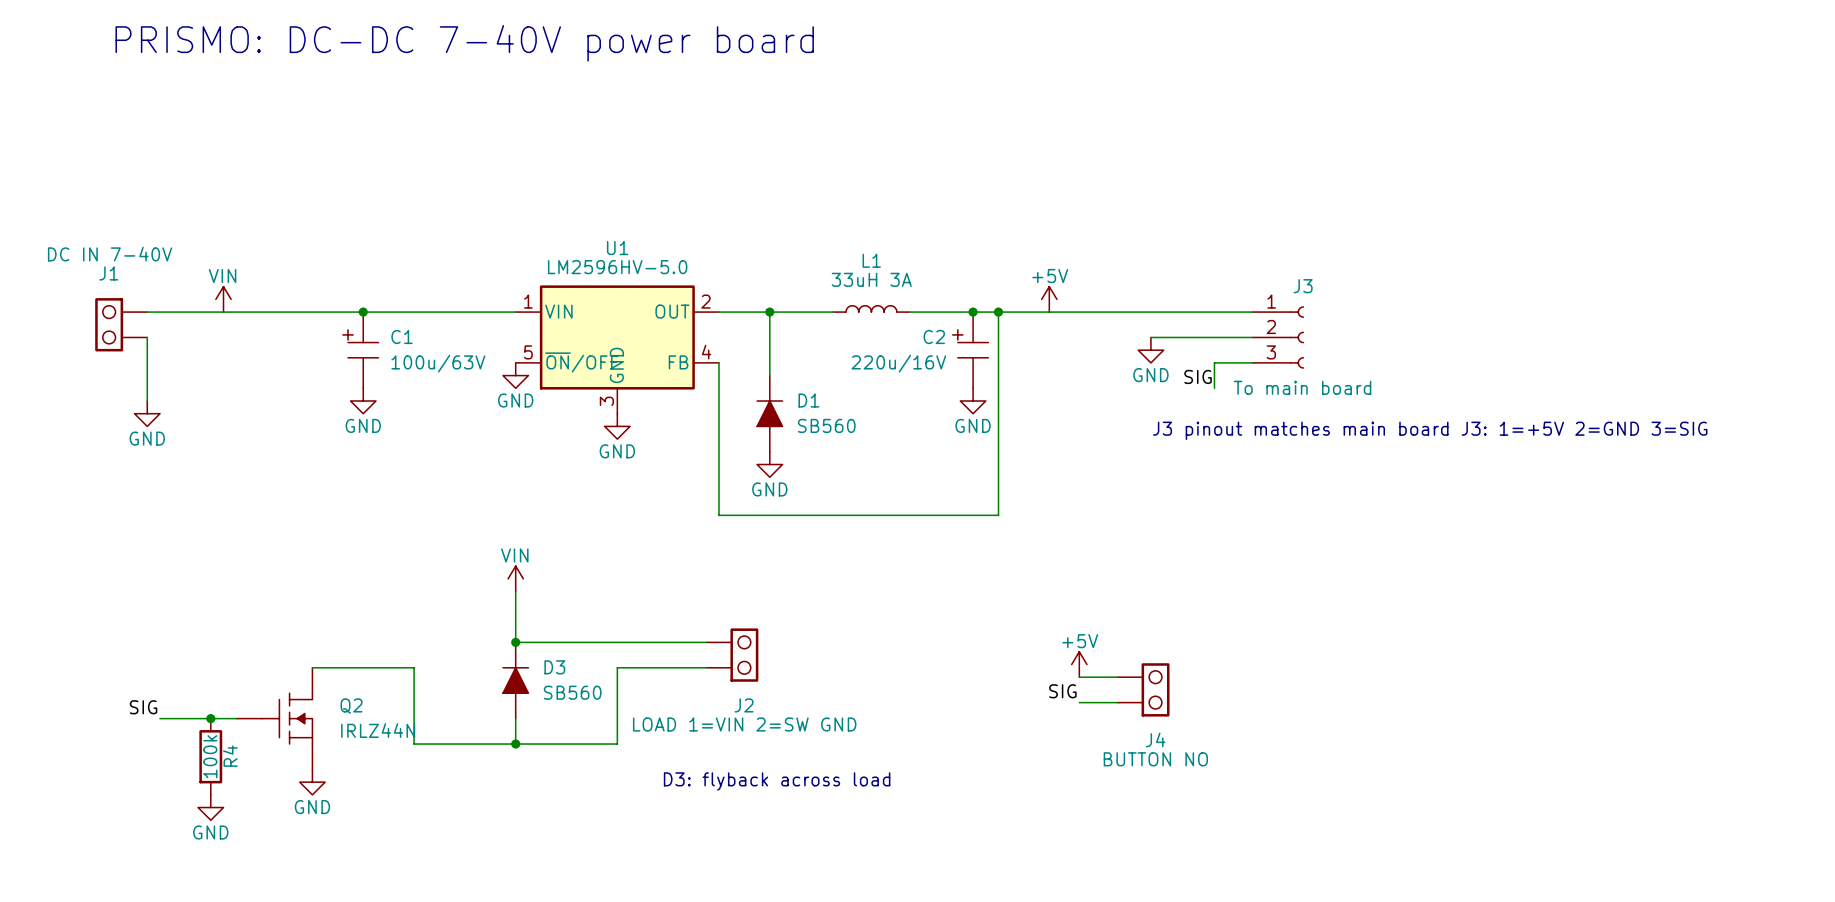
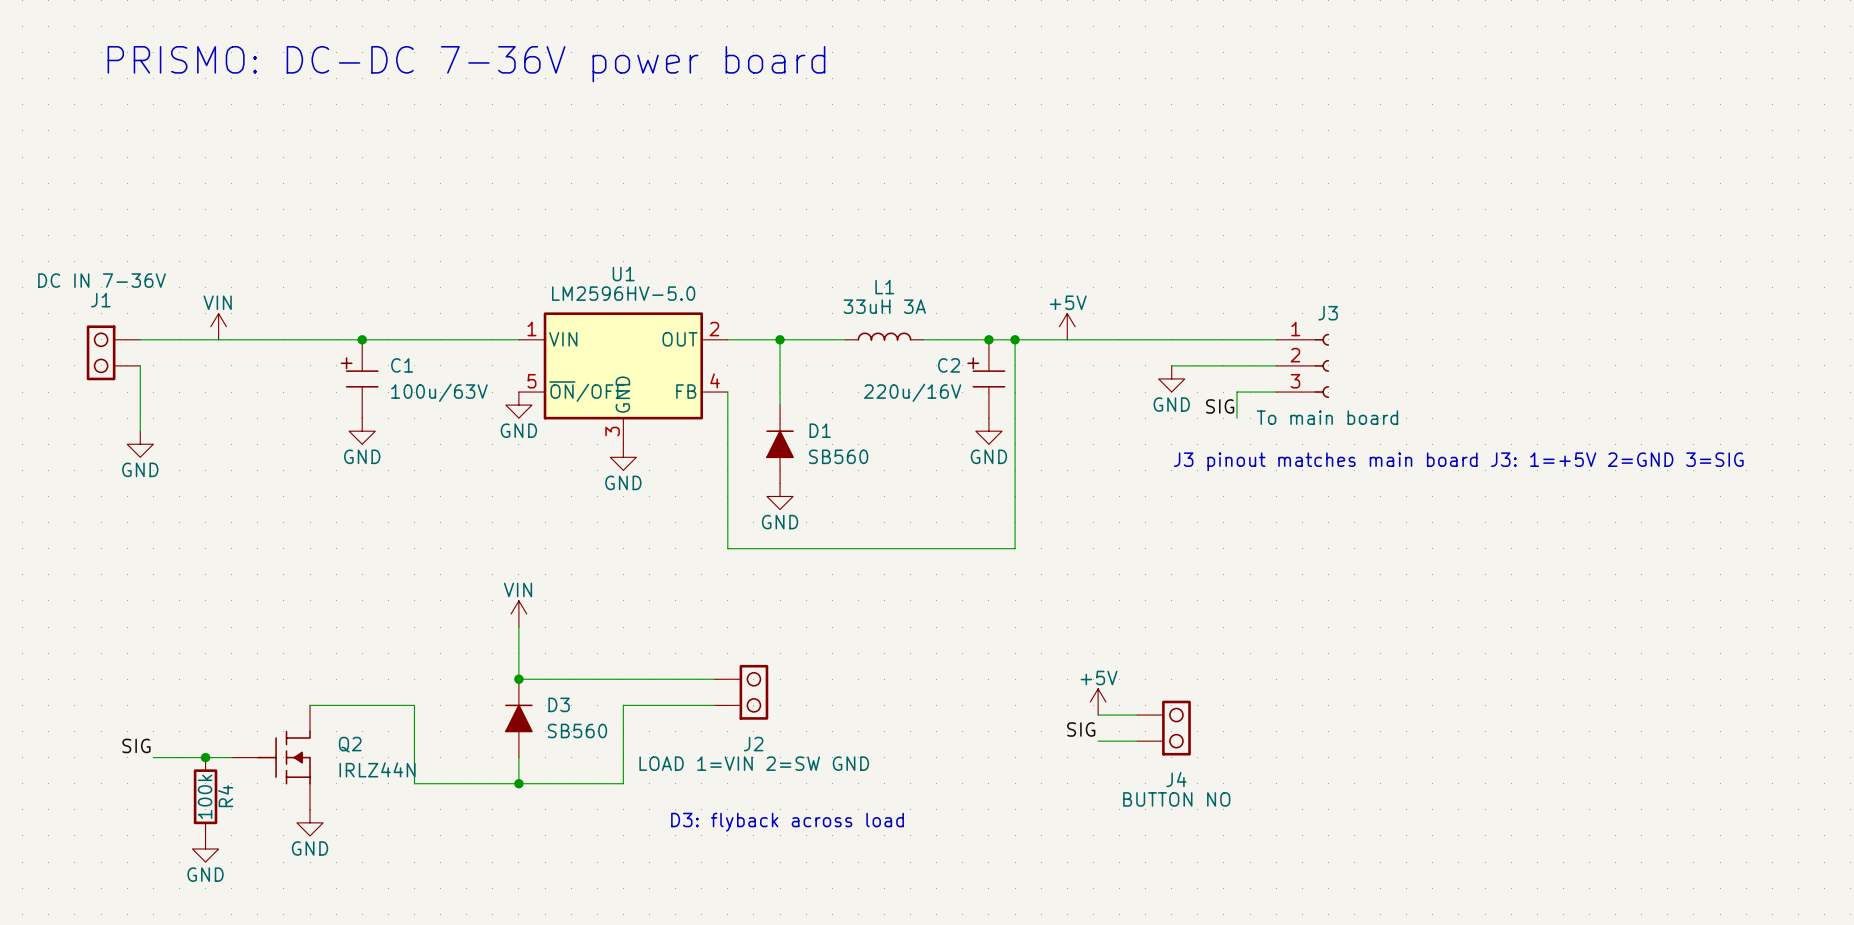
text: PRISMO: DC-DC 7-40V power board (464, 43) -> PRISMO: DC-DC 7-36V power board (466, 64)
J1 value: DC IN 7-40V (110, 254) -> DC IN 7-36V (102, 280)

